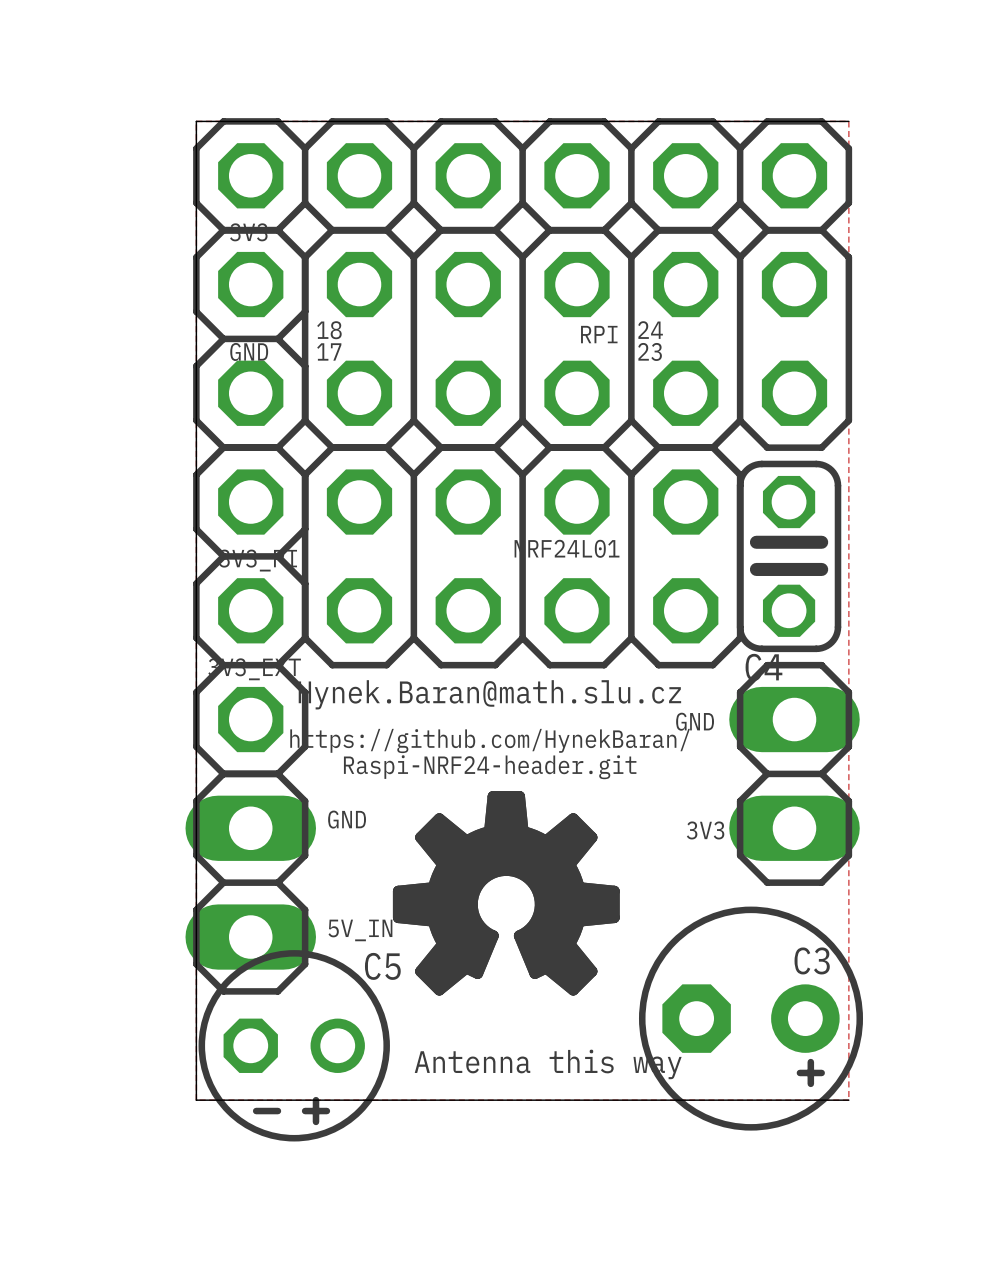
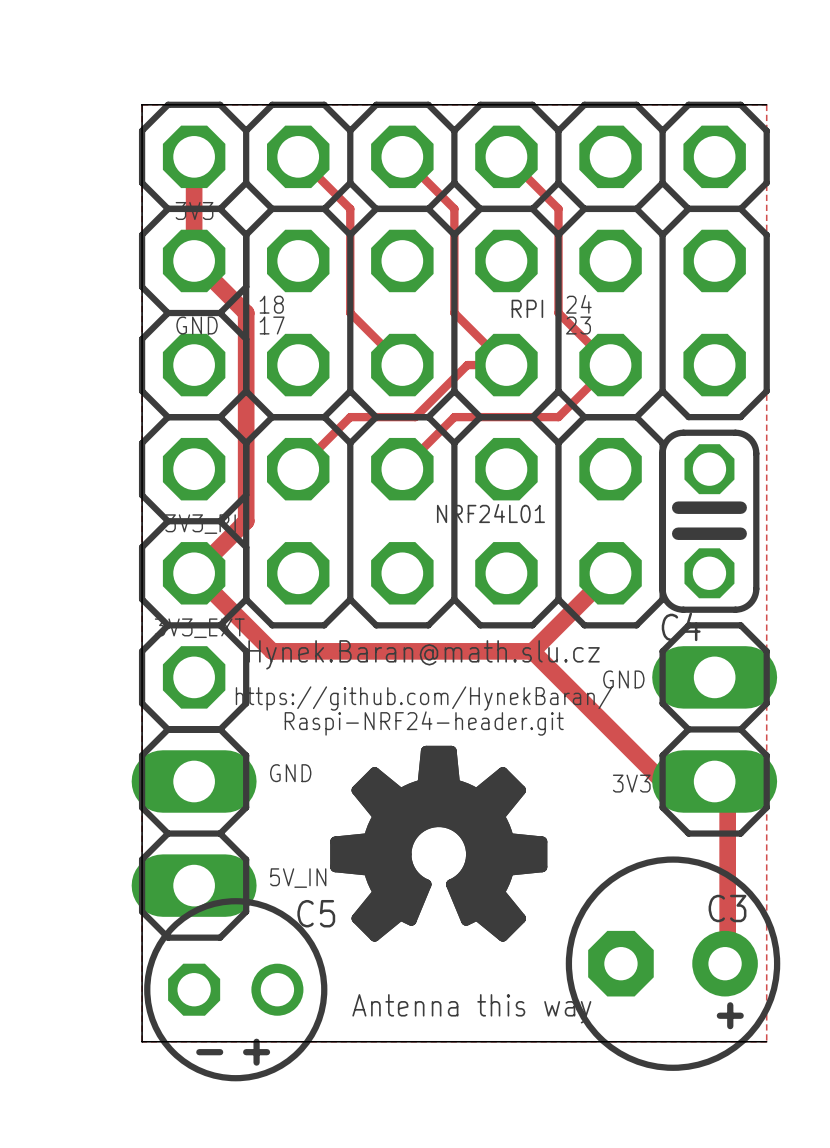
track: none -> (194, 156) (194, 260) (246, 313) (246, 521) (194, 573) (272, 651) (532, 651)
track: none -> (298, 156) (350, 208) (350, 313) (402, 365)
track: none -> (402, 156) (454, 208) (454, 313) (506, 365) (467, 365) (415, 417) (350, 417) (298, 469)
track: none -> (506, 156) (558, 208) (558, 313) (610, 365) (558, 417) (454, 417) (402, 469)
track: none -> (610, 573) (532, 651)
track: none -> (532, 651) (662, 781) (714, 781) (727, 794) (727, 963) (725, 963)

